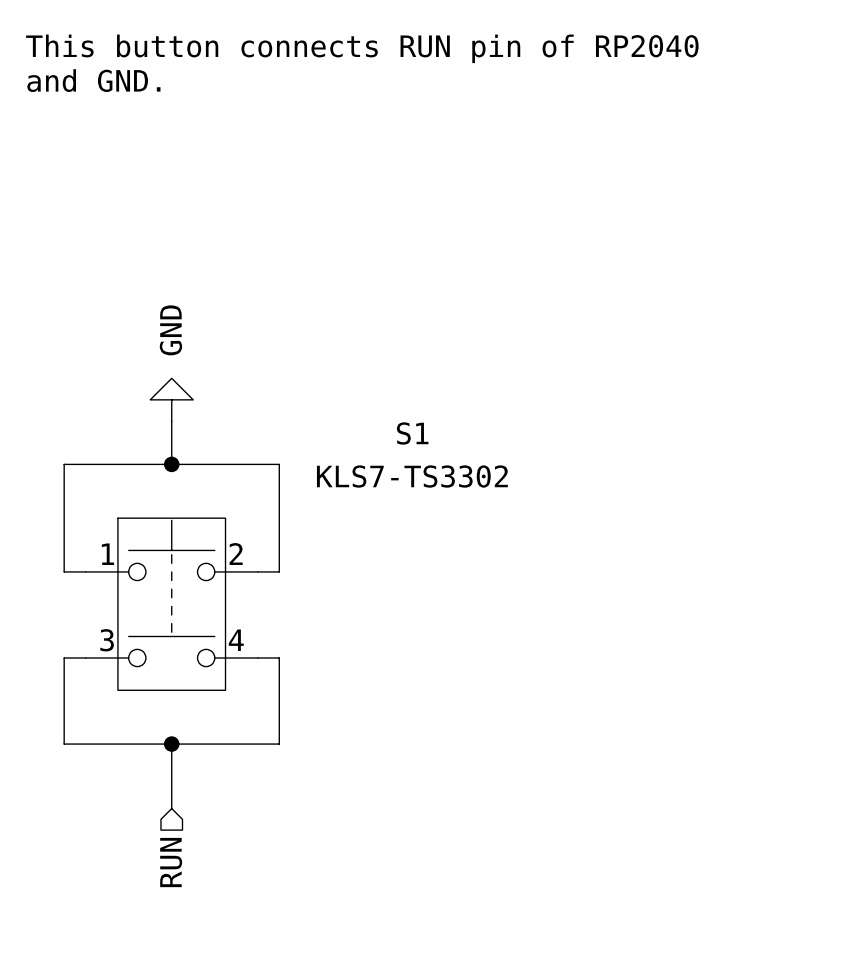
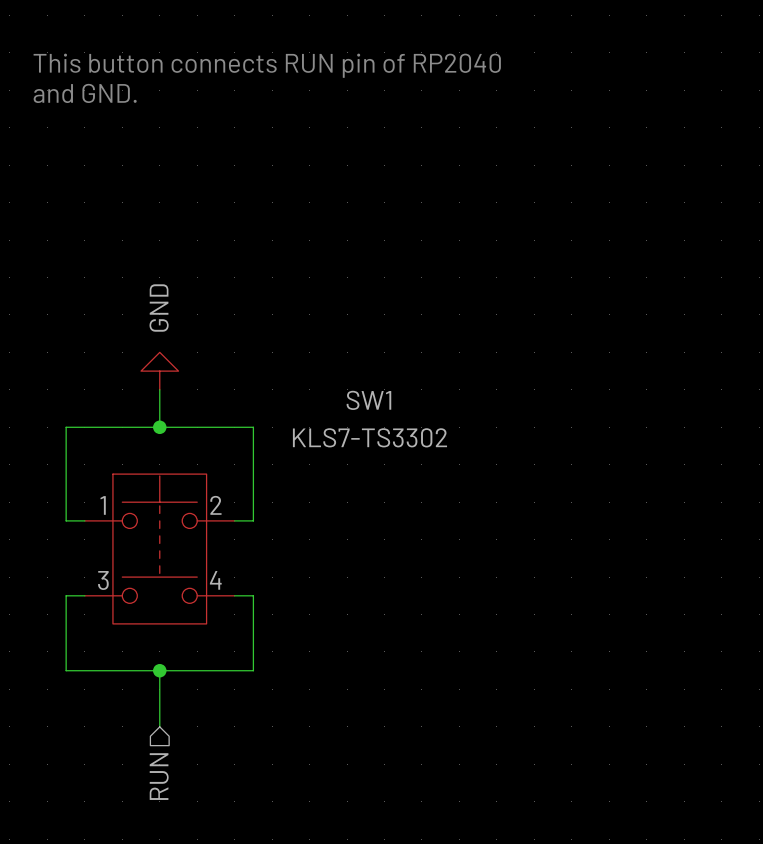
S1 name: S1 (412, 433) -> SW1 (368, 400)

